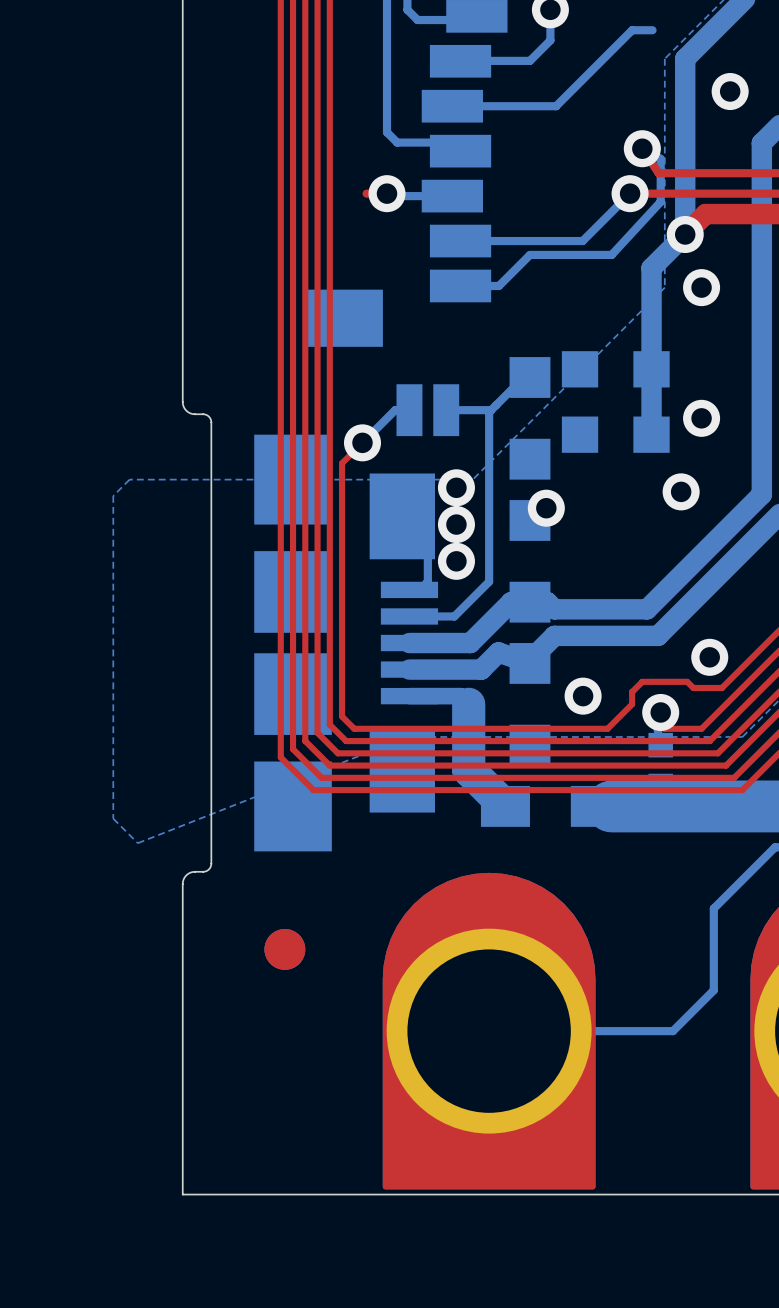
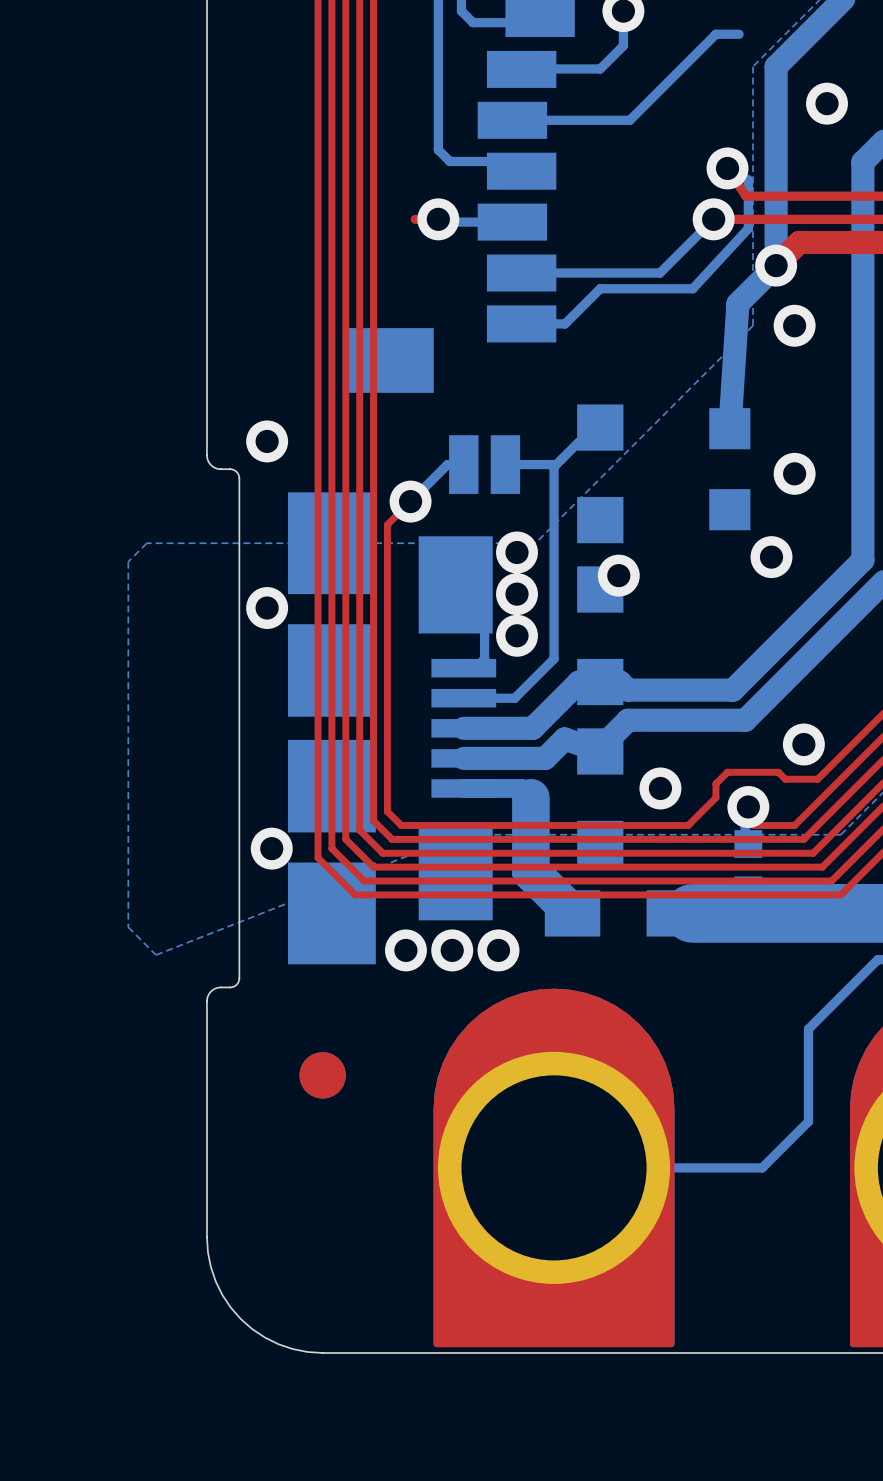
bottom track: (651, 268) (651, 434) -> (737, 303) (729, 428)
part: (615, 369) -> none
via: none -> (267, 441)
part: none -> (729, 469)
part: (615, 434) -> none
via: none -> (267, 608)
via: none -> (271, 848)
via: none -> (405, 950)
via: none -> (452, 950)
via: none -> (498, 950)
board edge: (182, 1092) (182, 1194) (284, 1194) -> (206, 1237) (207, 1252) (215, 1281) (222, 1295) (240, 1319) (264, 1337) (278, 1344) (307, 1351) (322, 1352)

